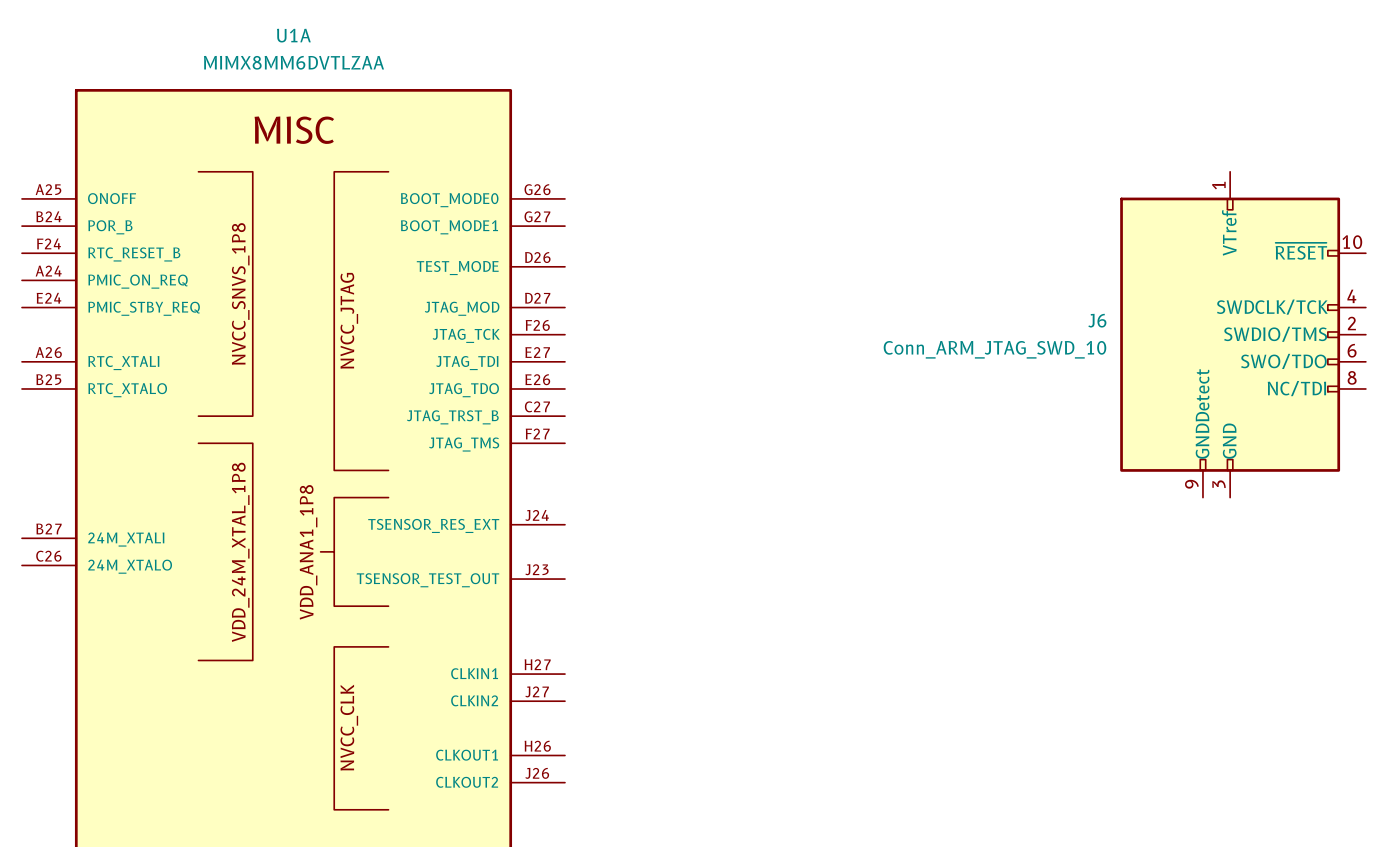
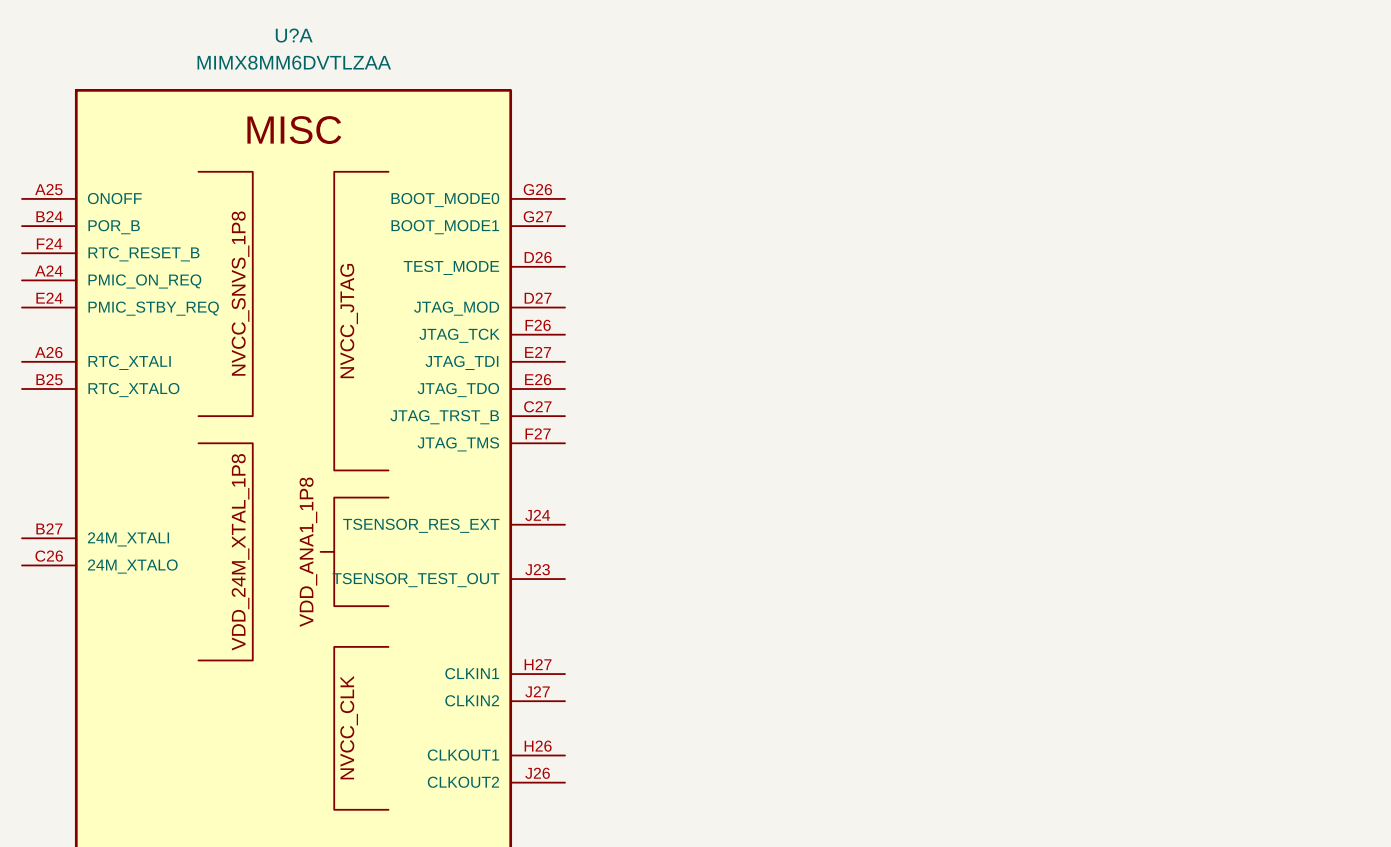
U1A name: U1A (293, 35) -> U?A (294, 35)
J6: Conn_ARM_JTAG_SWD_10 (1243, 334) -> none

